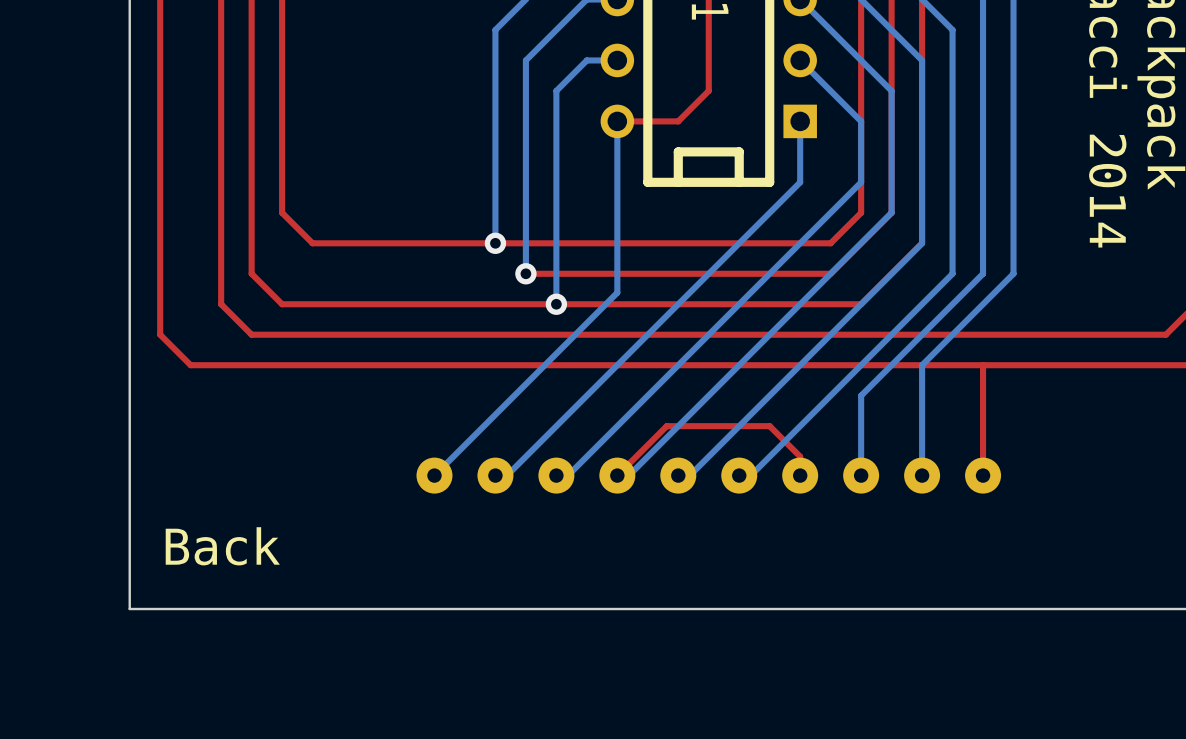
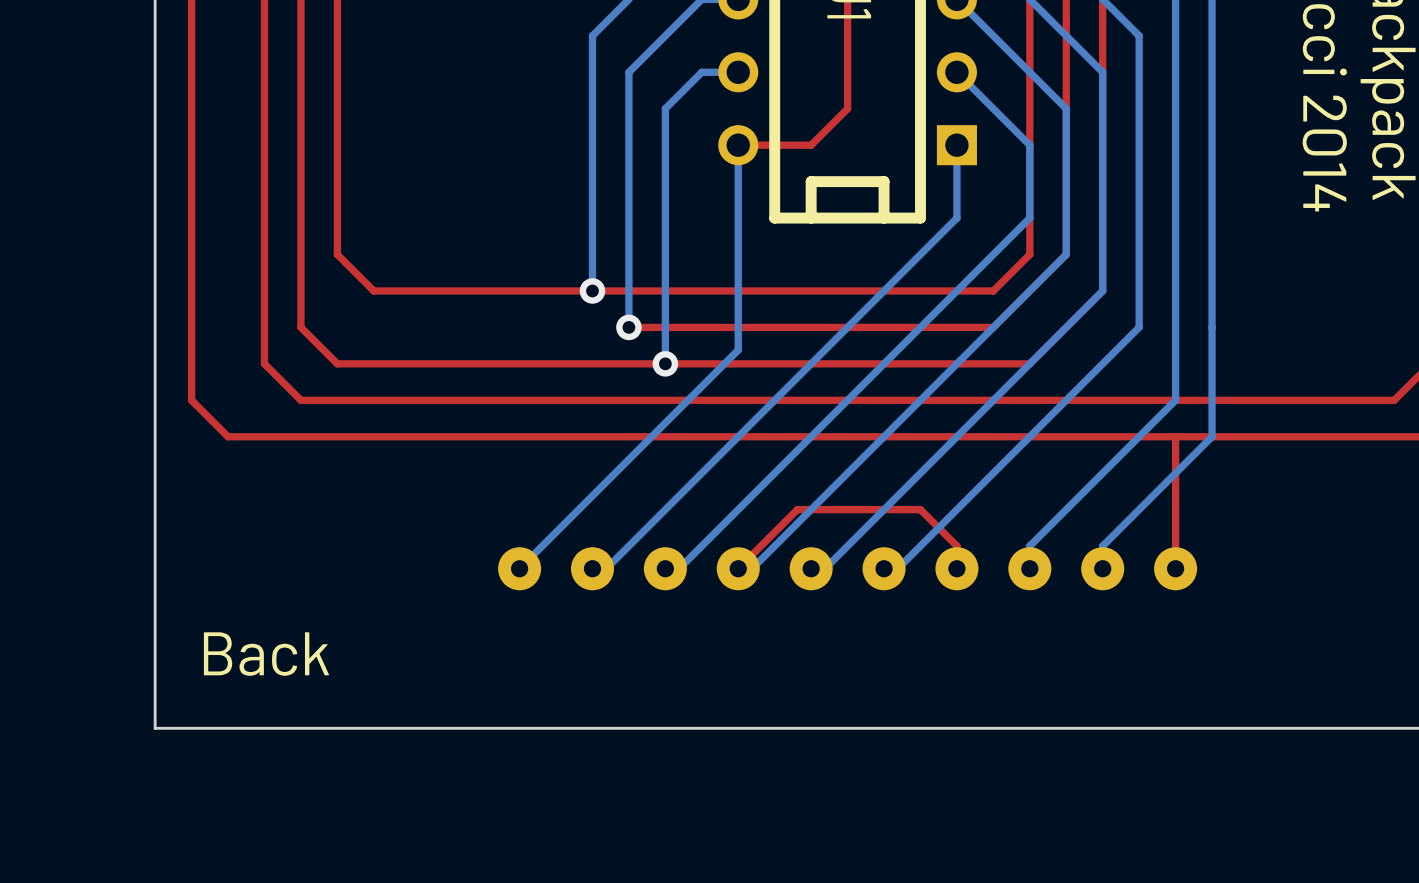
bottom track: (983, 273) (861, 395) (861, 456) -> (1175, 327) (1175, 400) (1029, 546)
bottom track: (1013, 273) (922, 365) (922, 456) -> (1212, 327) (1212, 436) (1102, 546)

